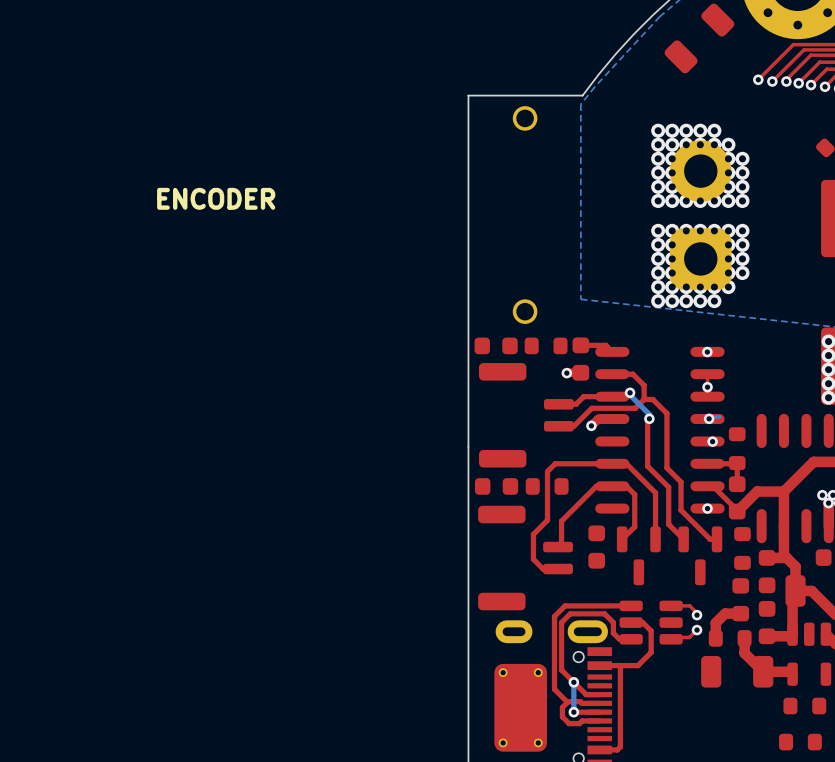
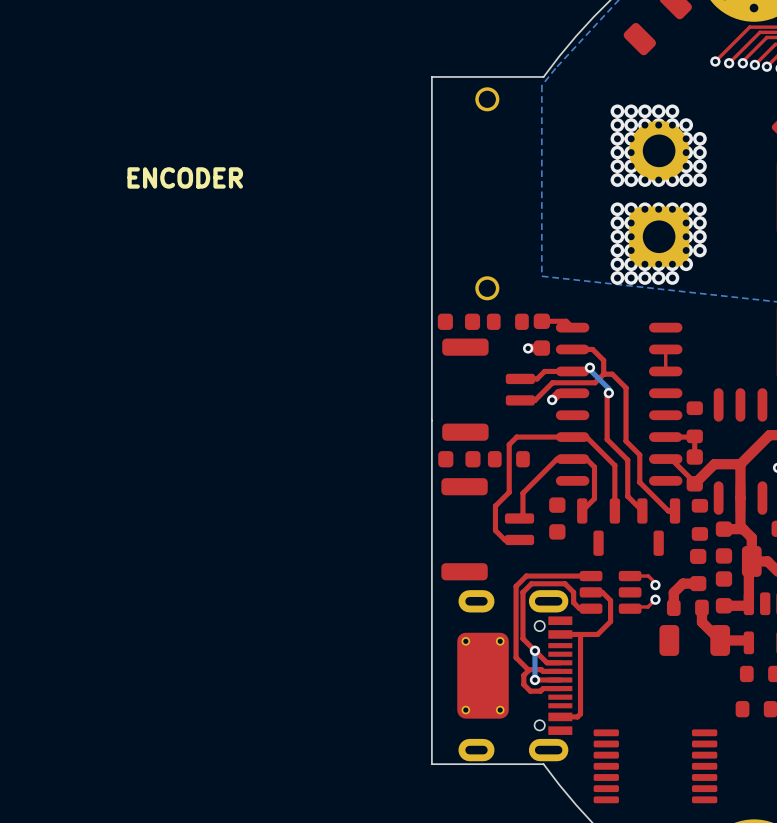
via: (707, 352) -> none
via: (707, 387) -> none
bottom track: (719, 417) (709, 418) -> none
via: (709, 418) -> none
via: (712, 441) -> none
via: (707, 508) -> none

